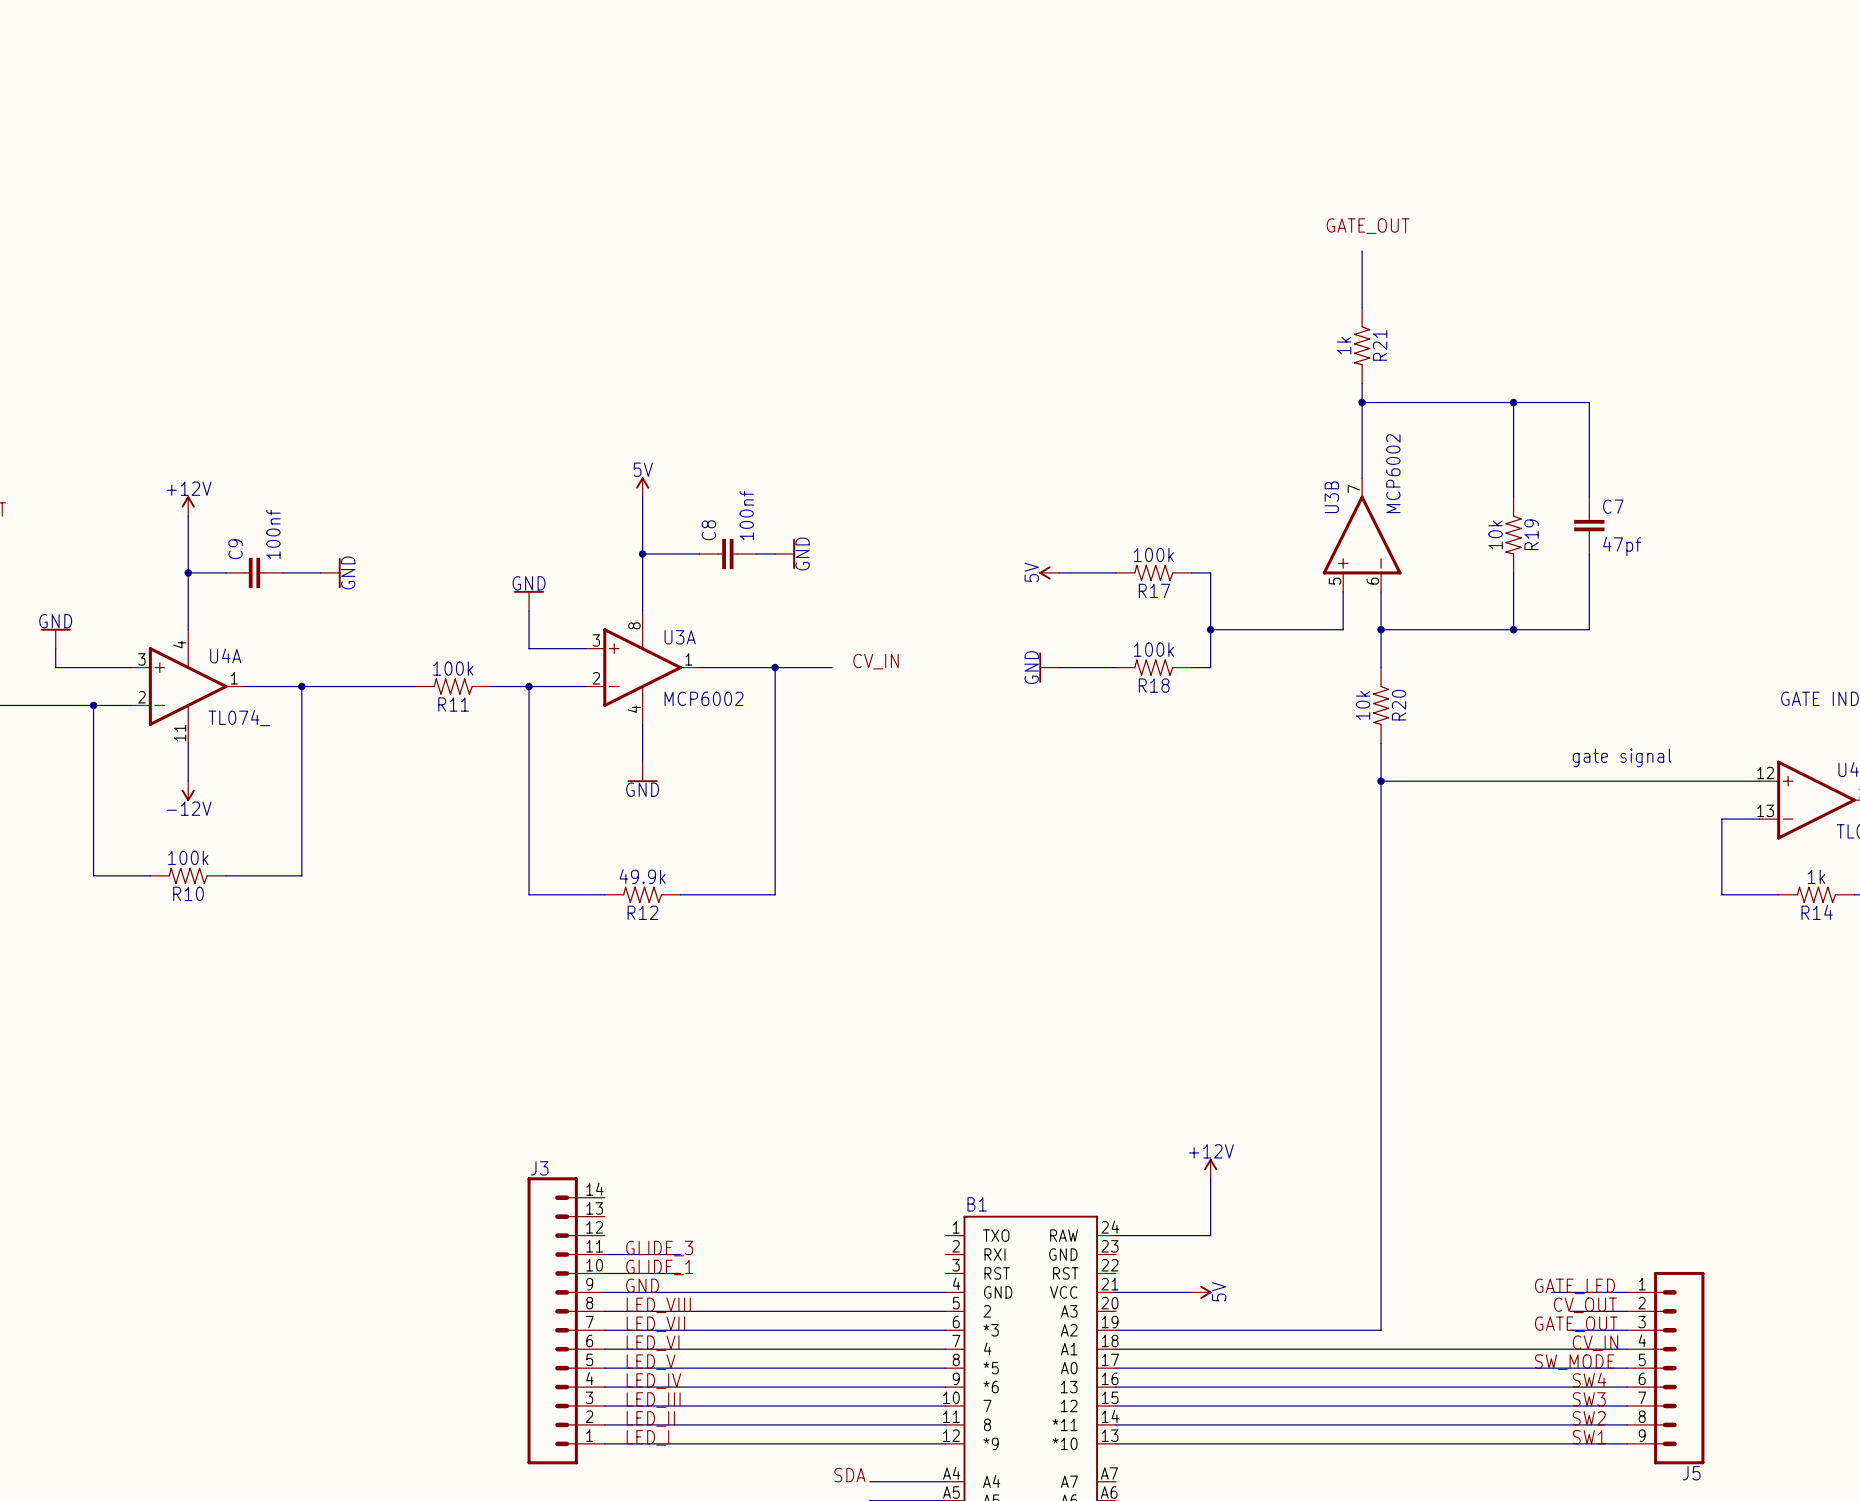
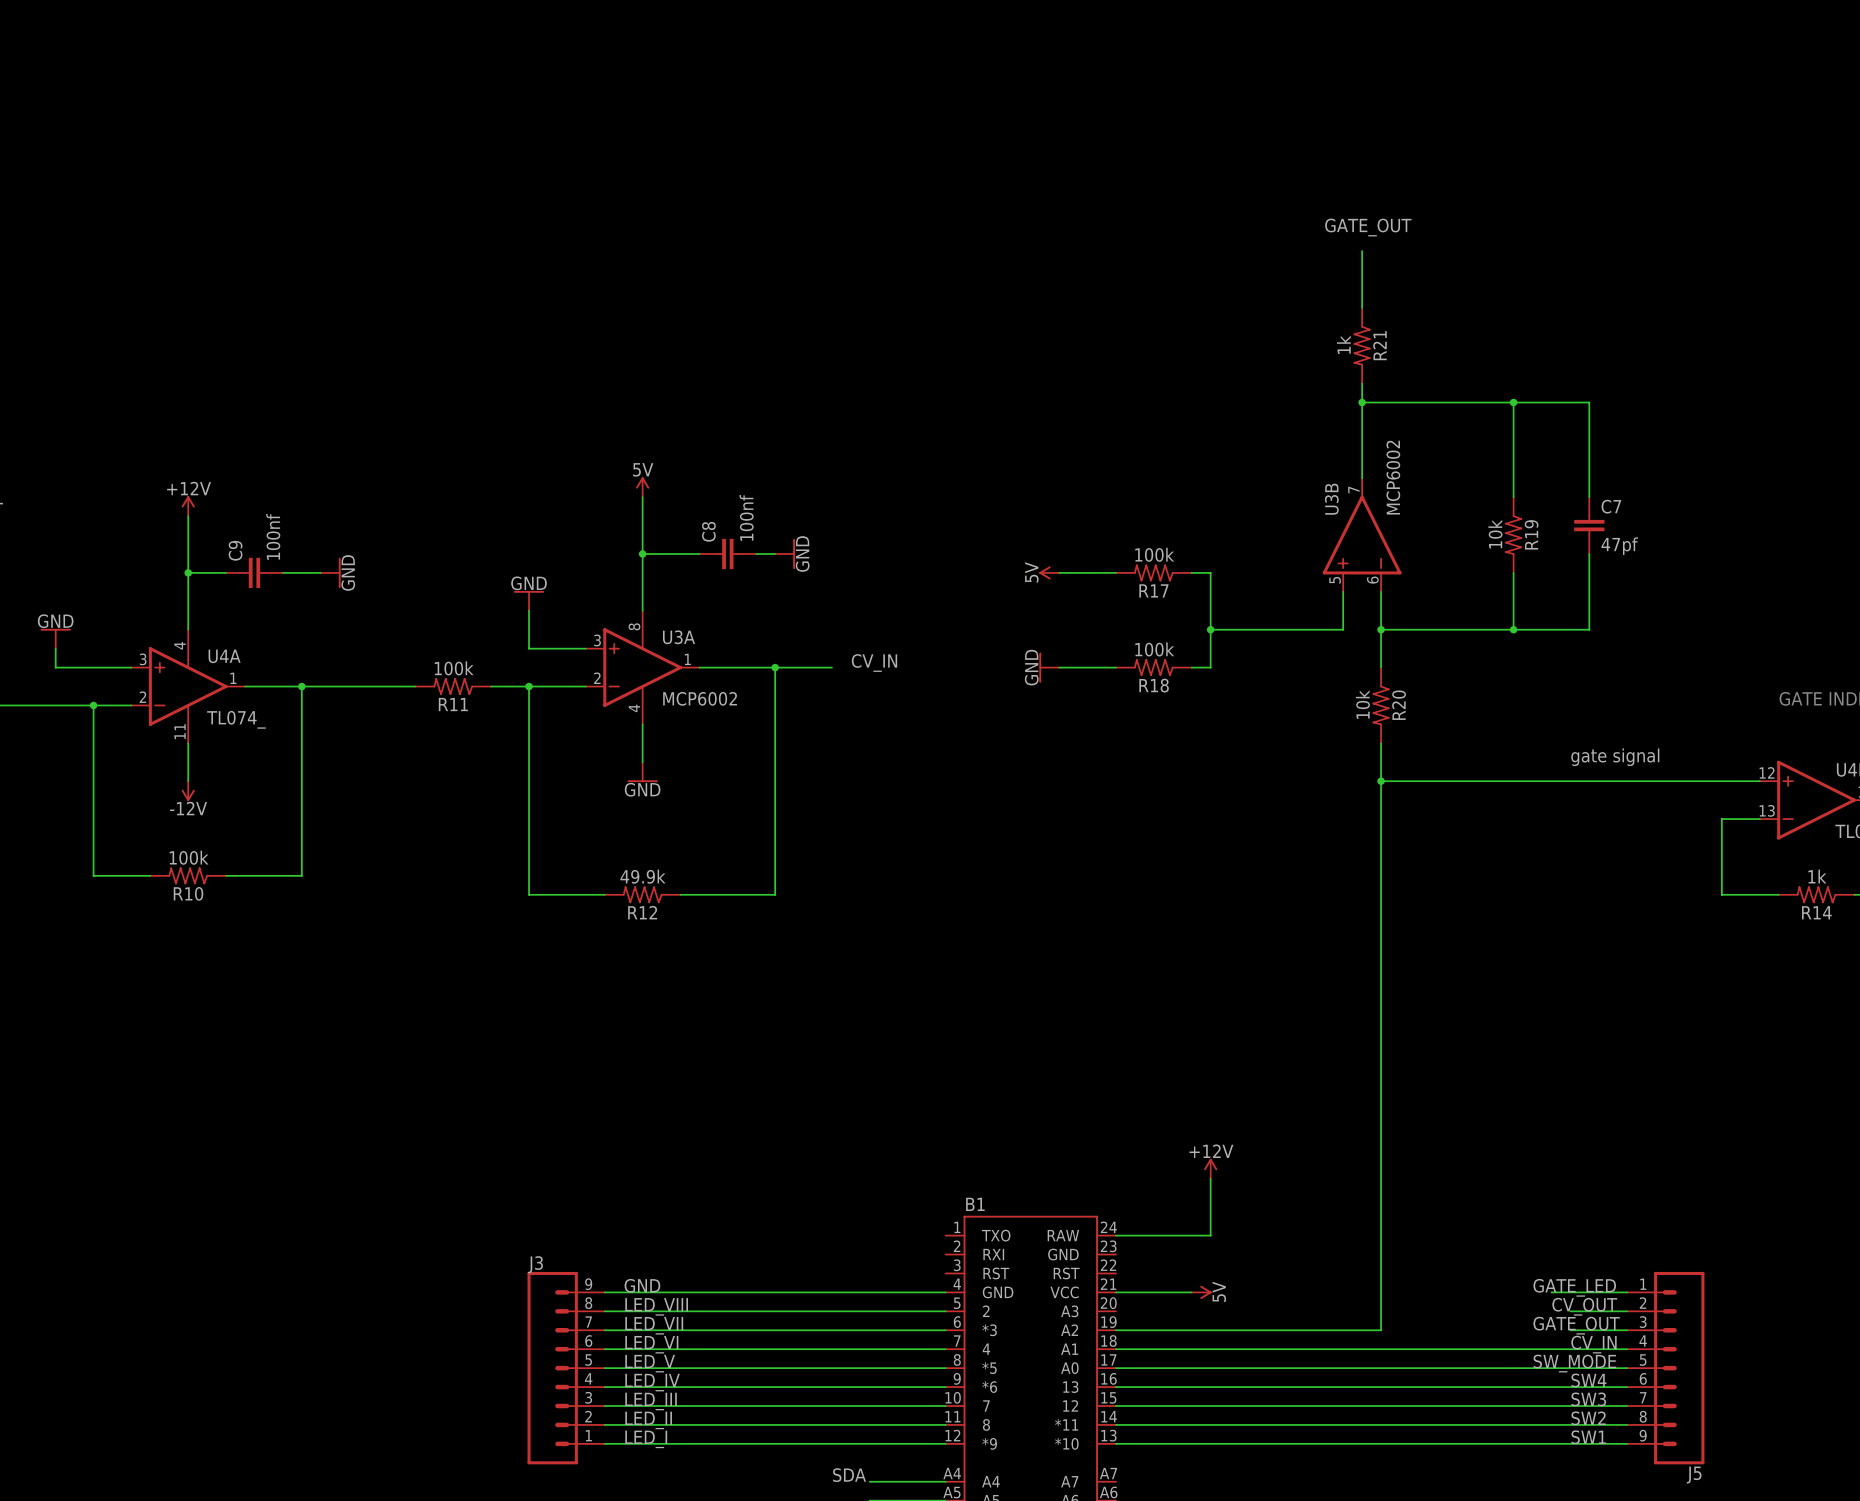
J3 name position: J3 (539, 1168) -> J3 (535, 1264)
J3 symbol: [527, 1177, 605, 1465] -> [527, 1271, 605, 1465]
label: GLIDE_3 (659, 1248) -> none
wire: (604, 1254) (680, 1254) -> none
label: GLIDE_1 (659, 1267) -> none
wire: (604, 1273) (680, 1273) -> none

